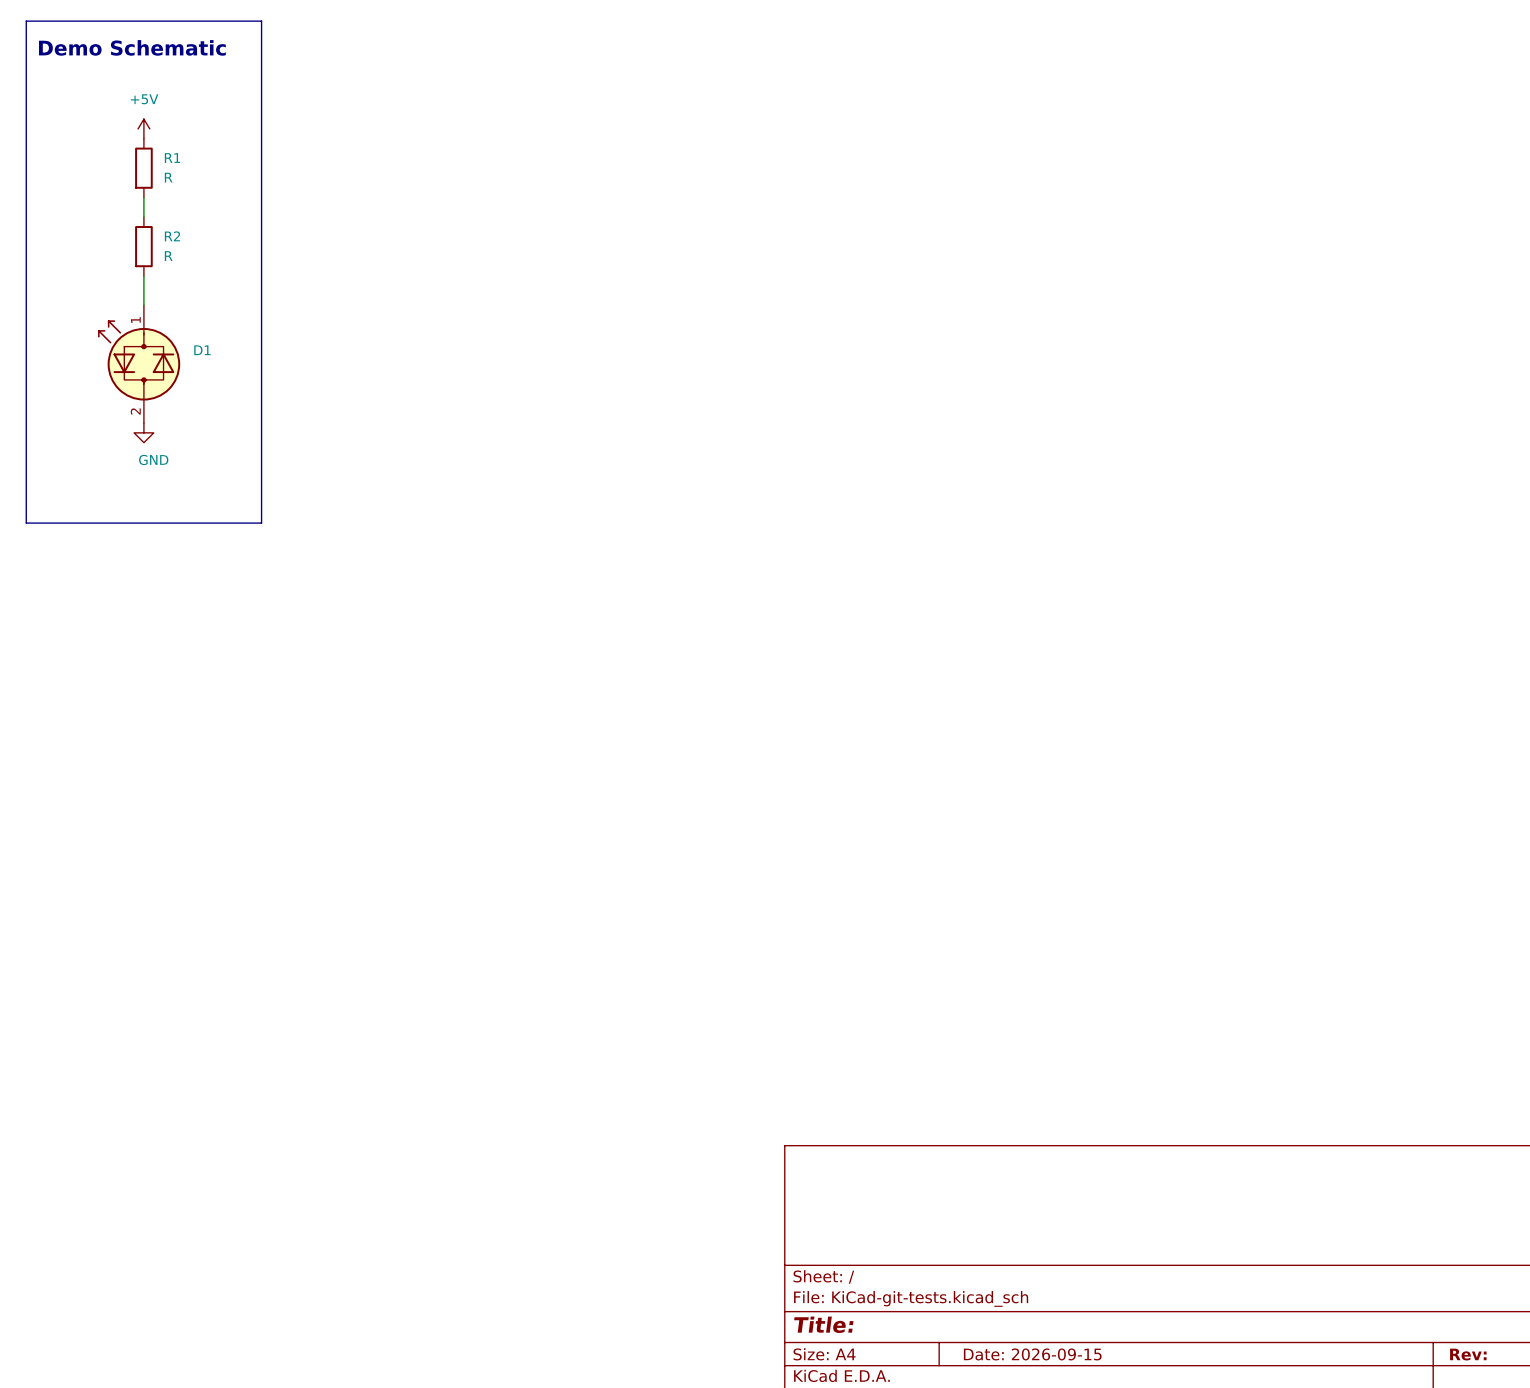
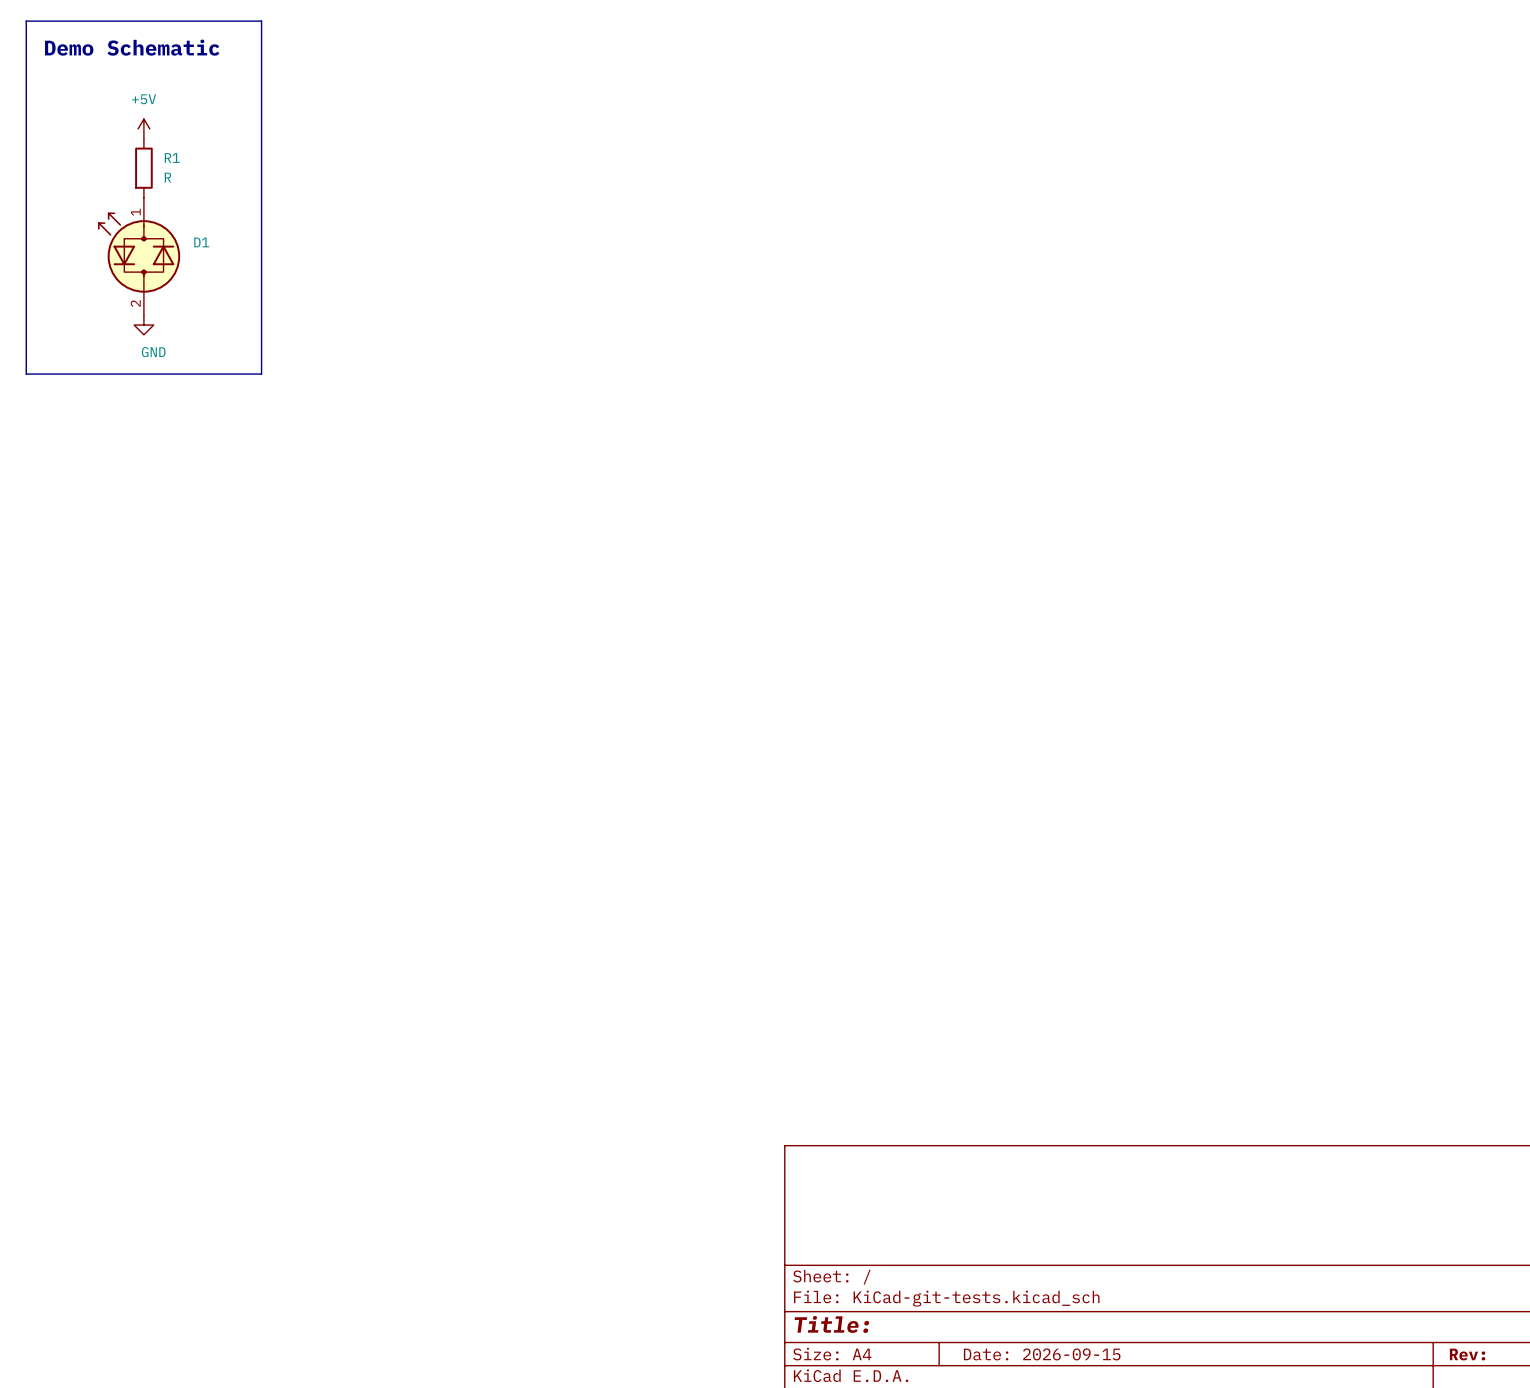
R2: R (143, 246) -> none
D1 position: (139, 364) -> (139, 256)
line: (26, 374) (26, 523) (261, 523) (261, 374) -> (26, 374) (261, 374)
power symbol position: GND (143, 432) -> GND (143, 325)

